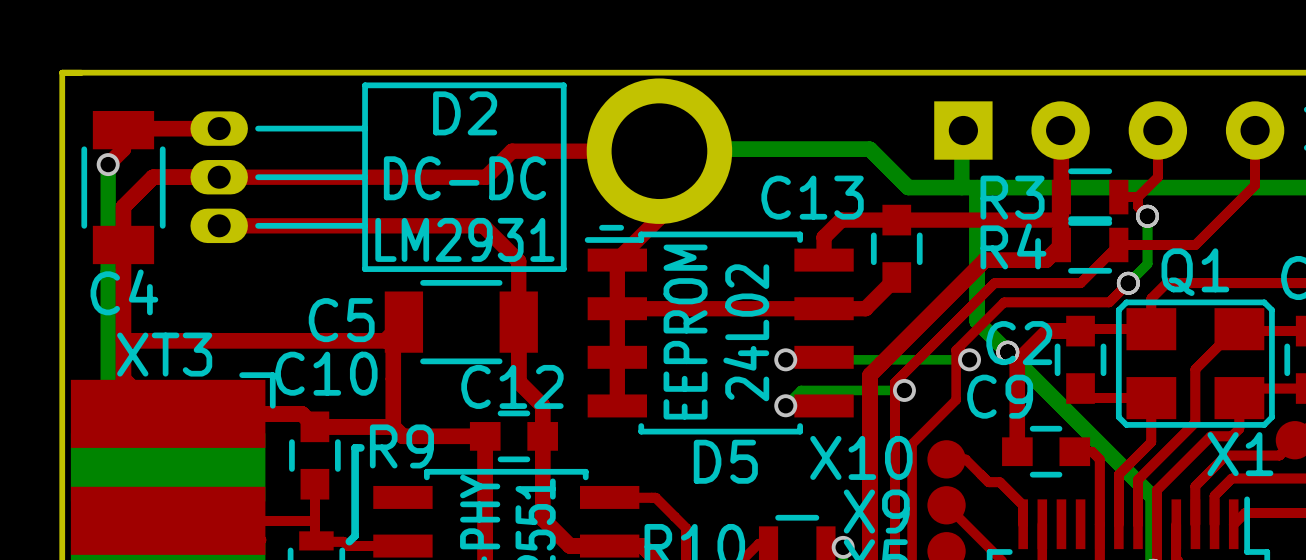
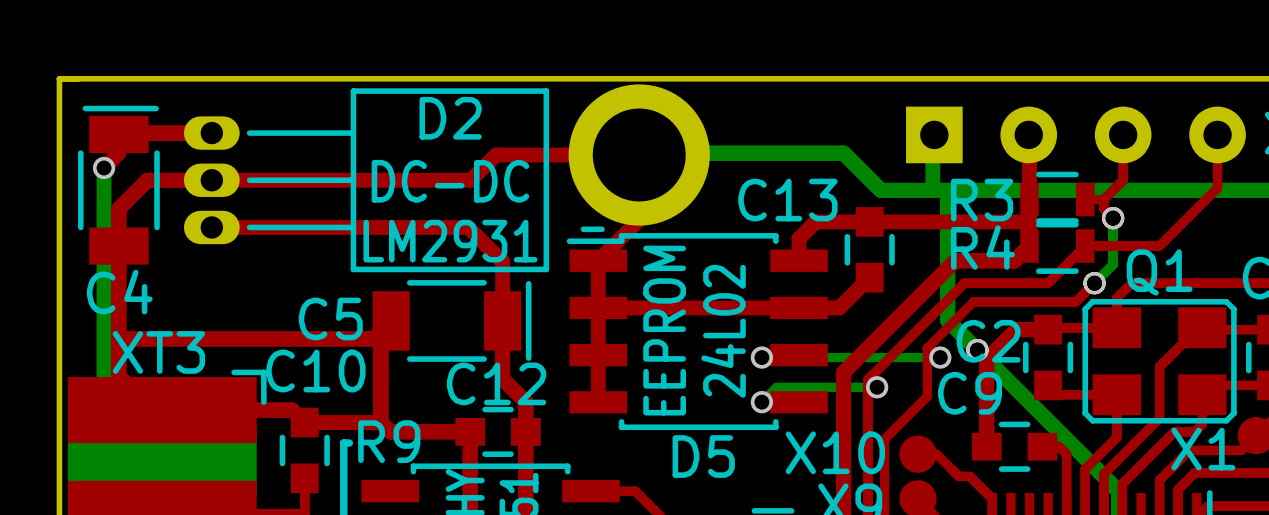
C4 footprint: [81, 110, 166, 265] -> [78, 105, 160, 265]
C5 footprint: [384, 280, 538, 365] -> [372, 280, 532, 362]

